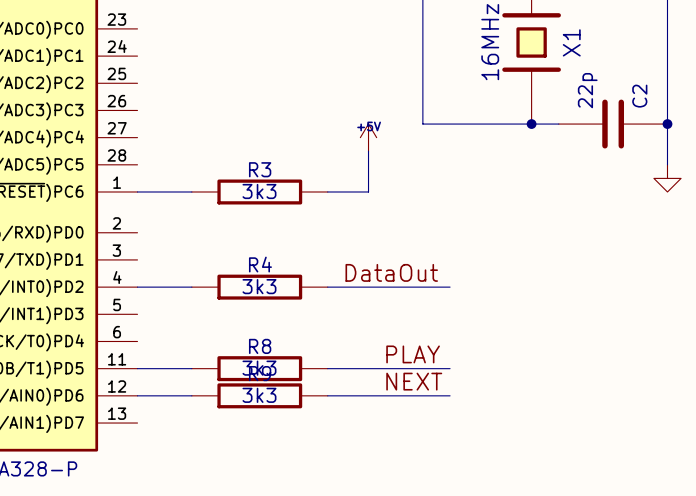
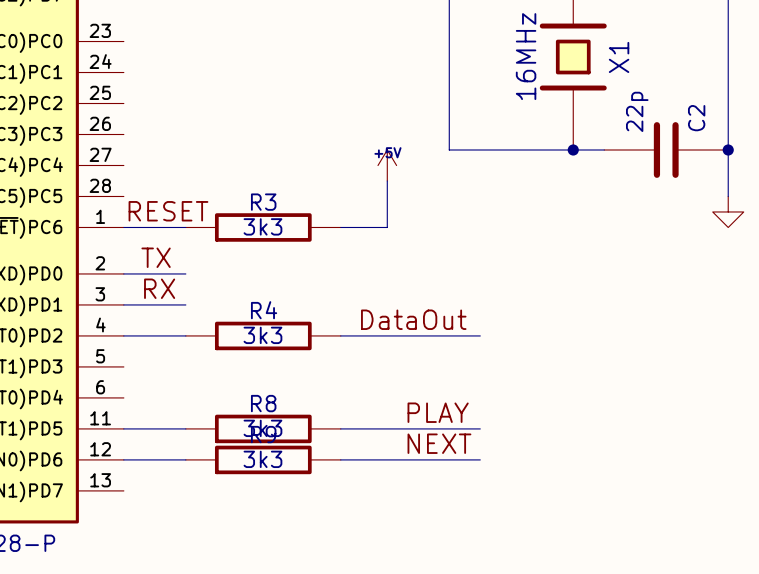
label: none -> RESET (168, 211)
label: none -> TX (156, 257)
wire: none -> (123, 273) (185, 273)
label: none -> RX (159, 288)
wire: none -> (123, 304) (185, 304)

